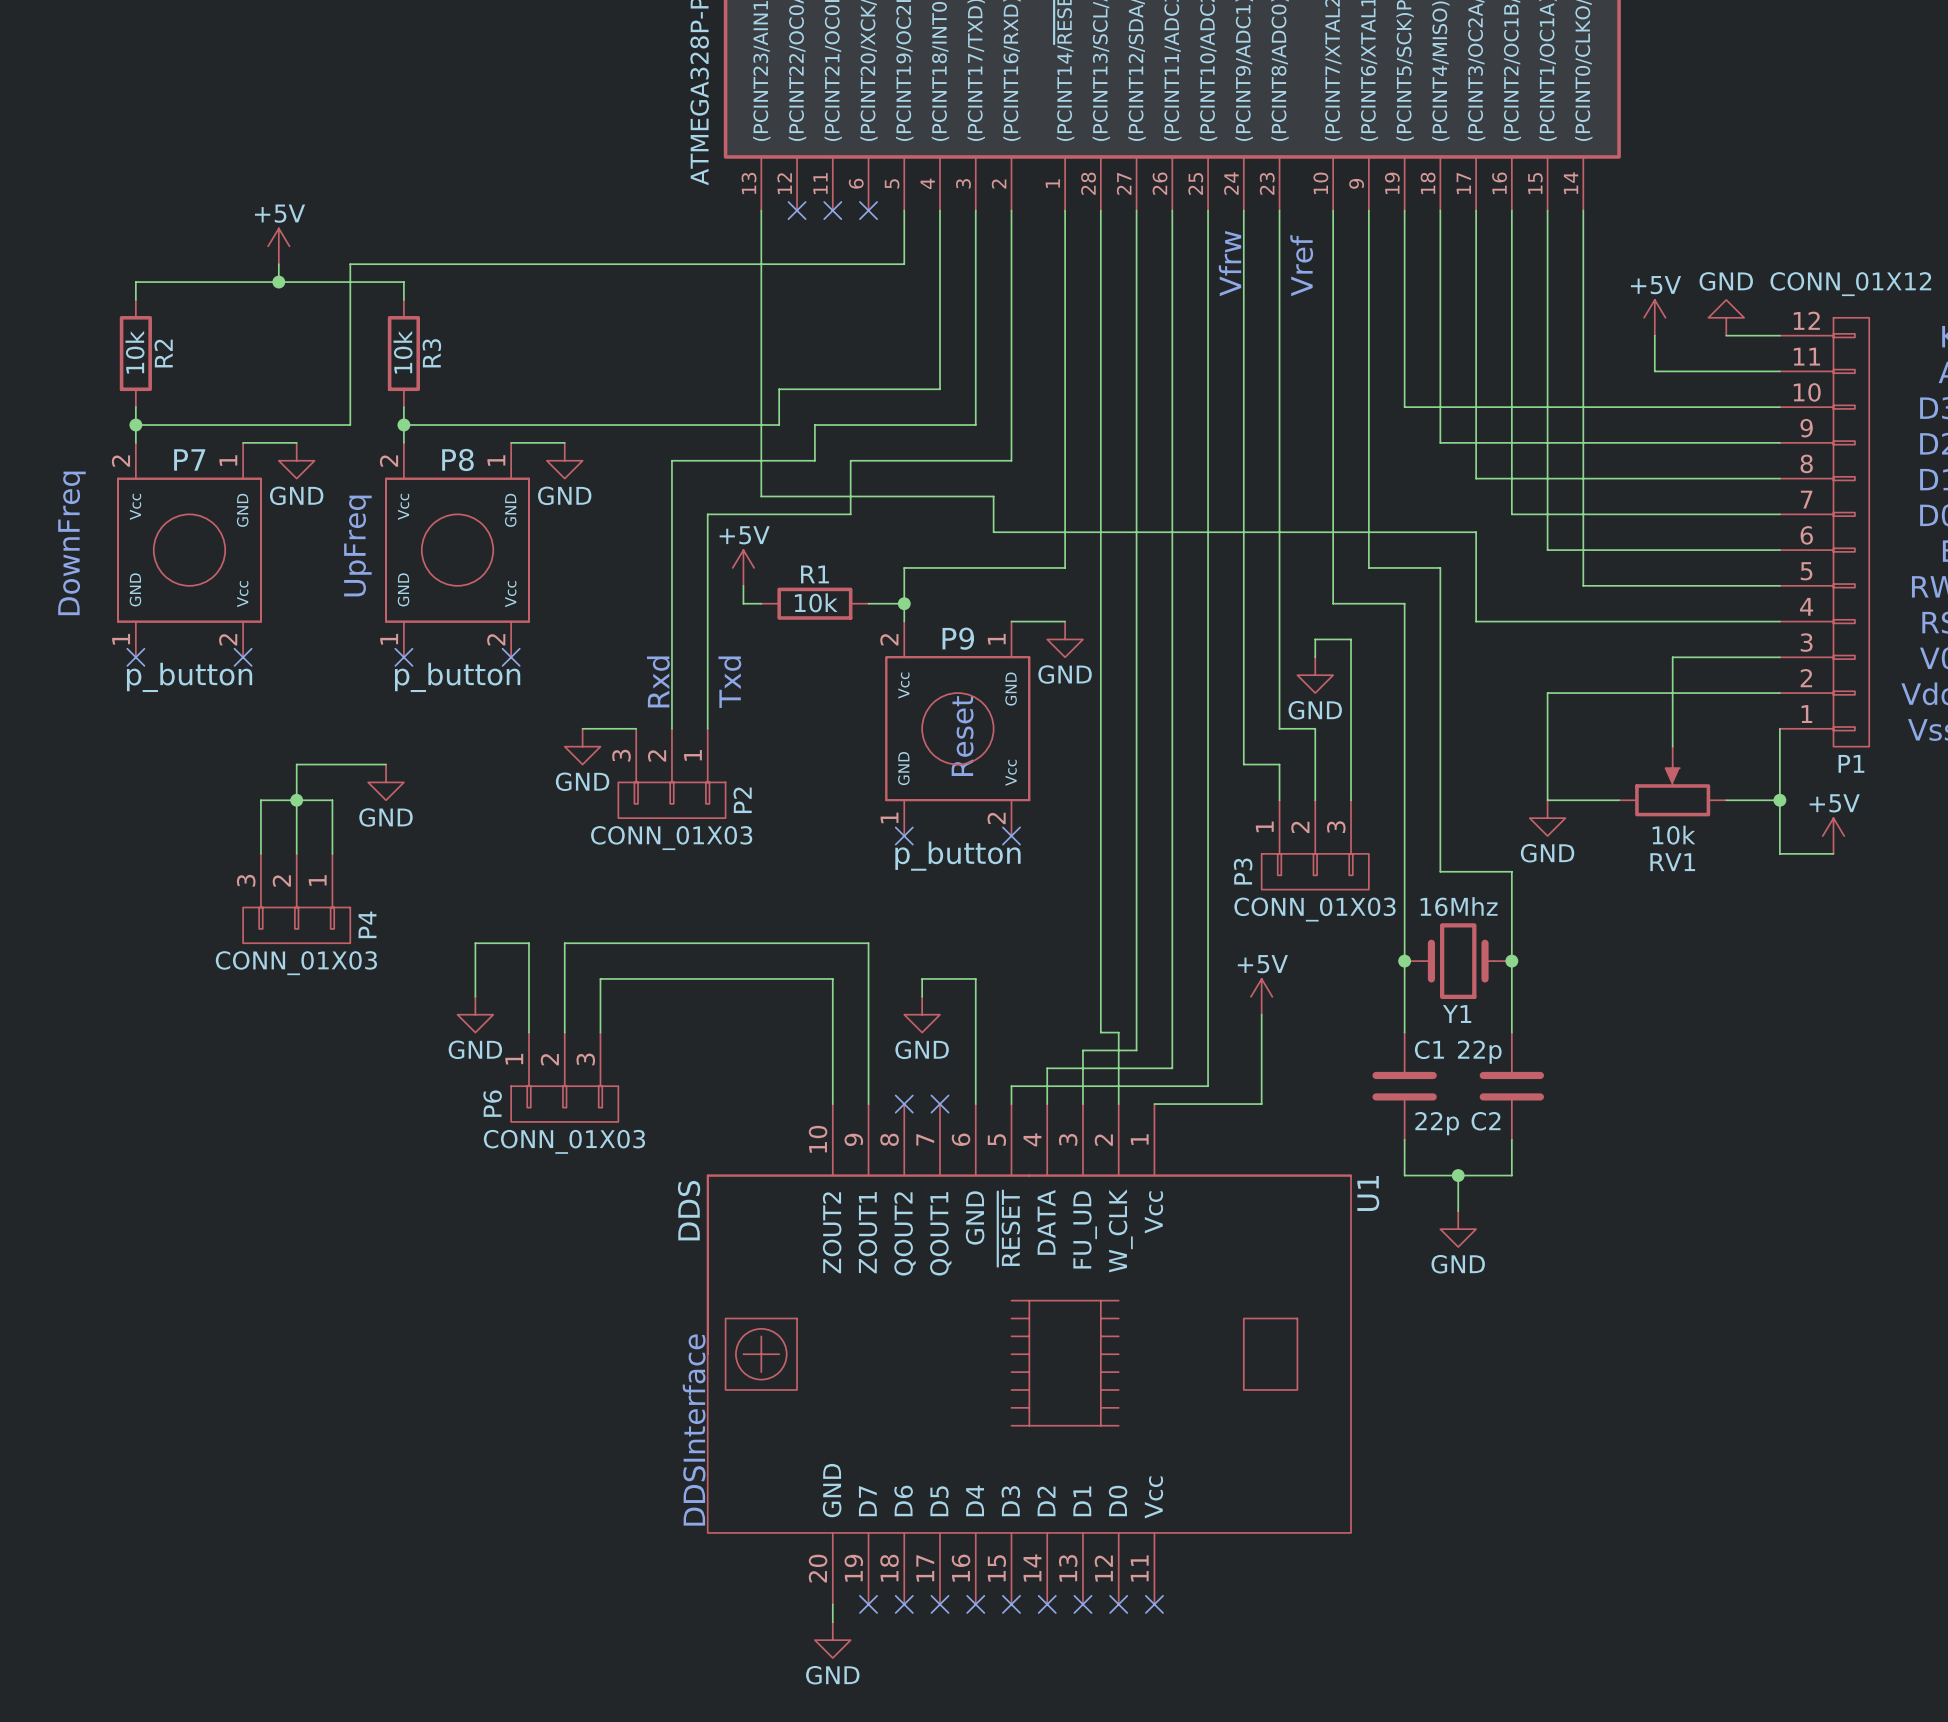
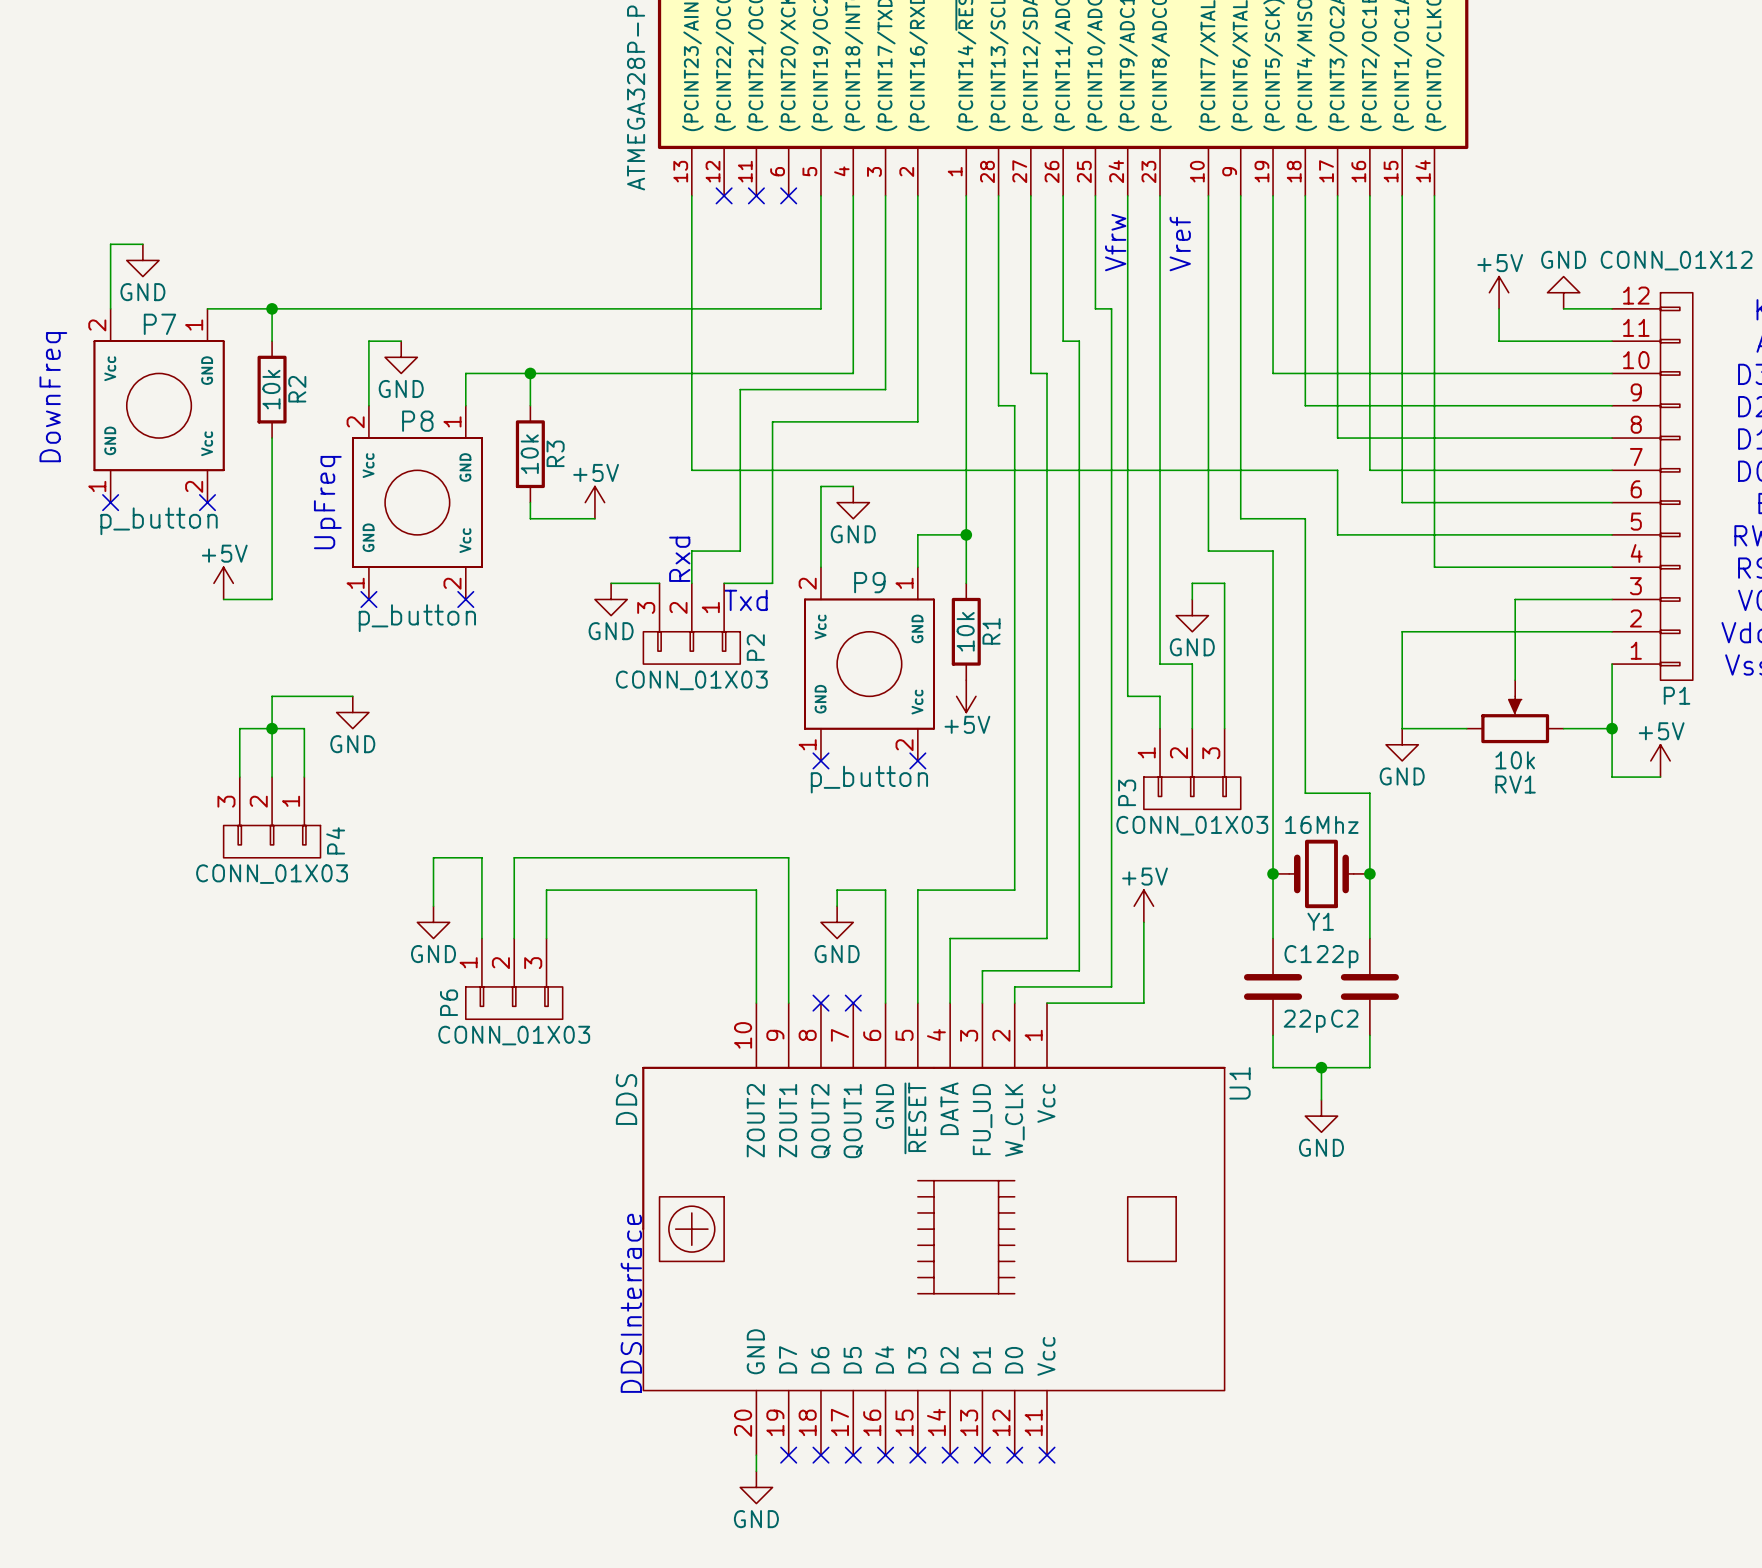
power symbol: +5V (278, 246) -> none
wire: none -> (142, 244) (110, 244) (110, 308)
wire: (278, 264) (278, 282) -> none
wire: (904, 264) (350, 264) (350, 425) (135, 425) -> (820, 244) (820, 308) (207, 308)
power symbol: none -> GND (142, 260)
junction position: (278, 282) -> (272, 308)
wire: (135, 299) (135, 282) (403, 282) (403, 299) -> none
wire: (1208, 335) (1208, 1086) -> (1095, 308) (1111, 308) (1111, 986) (1095, 986)
R2 position: (135, 353) -> (272, 389)
R3 position: (403, 353) -> (530, 454)
wire: none -> (401, 341) (368, 341) (368, 373)
wire: (1172, 371) (1172, 1068) -> (1063, 341) (1079, 341) (1079, 970) (1063, 970)
power symbol: none -> GND (401, 357)
wire: (940, 389) (779, 389) (779, 425) (403, 425) -> (853, 357) (853, 373) (465, 373) (465, 405)
wire: (135, 407) (135, 442) -> (272, 308) (272, 341)
wire: none -> (530, 373) (530, 405)
junction: none -> (530, 373)
wire: (1136, 407) (1136, 1050) (1082, 1050) (1082, 1068) (1047, 1068) -> (1030, 373) (1047, 373) (1047, 938) (1014, 938)
junction: (135, 425) -> none
junction: (403, 425) -> none
wire: (243, 442) (296, 442) -> none
wire: (511, 442) (564, 442) -> none
wire: (1100, 442) (1100, 1032) -> (998, 405) (1014, 405) (1014, 890) (917, 890) (917, 986)
power symbol: GND (296, 460) -> none
power symbol: GND (564, 460) -> none
wire: (814, 460) (671, 460) (671, 728) -> (740, 421) (740, 551) (691, 551) (691, 583)
wire: none -> (272, 438) (272, 599) (223, 599)
wire: (761, 496) (993, 496) (993, 532) (1476, 532) -> (724, 583) (772, 583) (772, 470) (1337, 470) (1337, 486)
wire: (761, 514) (707, 514) (707, 728) -> (691, 470) (691, 454)
text position: DownFreq (71, 543) -> DownFreq (53, 397)
no-connect mark: none -> (110, 502)
P7 position: (189, 550) -> (159, 405)
no-connect mark: none -> (207, 502)
wire: none -> (530, 502) (530, 518) (594, 518)
power symbol position: +5V (743, 567) -> +5V (594, 502)
wire: (904, 567) (1065, 567) -> (820, 518) (820, 486) (853, 486)
wire: none -> (966, 518) (966, 583)
wire: (743, 585) (743, 603) (761, 603) -> none
junction: none -> (966, 534)
wire: (1476, 585) (1476, 621) (1583, 621) -> (1337, 534) (1434, 534) (1434, 567)
R1 rotation: 0° (814, 603) -> 90° clockwise (966, 631)
R1 position: (814, 603) -> (966, 631)
wire: (868, 603) (904, 603) -> none
junction: (904, 603) -> none
wire: (1011, 621) (1065, 621) -> (917, 567) (917, 534) (966, 534)
power symbol: none -> +5V (223, 583)
power symbol position: GND (1065, 639) -> GND (853, 502)
no-connect mark: (135, 657) -> none
no-connect mark: (243, 657) -> none
power symbol: none -> GND (611, 599)
text position: Rxd (658, 681) -> Rxd (679, 559)
text rotation: 0° (729, 682) -> 90° clockwise (745, 600)
text position: Txd (729, 682) -> Txd (745, 600)
wire: (582, 728) (636, 728) -> (611, 583) (659, 583)
text: Reset (962, 736) -> none
power symbol: GND (582, 746) -> none
power symbol: none -> +5V (966, 696)
P2 position: (671, 773) -> (691, 623)
wire: none -> (998, 938) (950, 938) (950, 970)
wire: (1118, 1032) (1118, 1086) (1011, 1086) -> none

